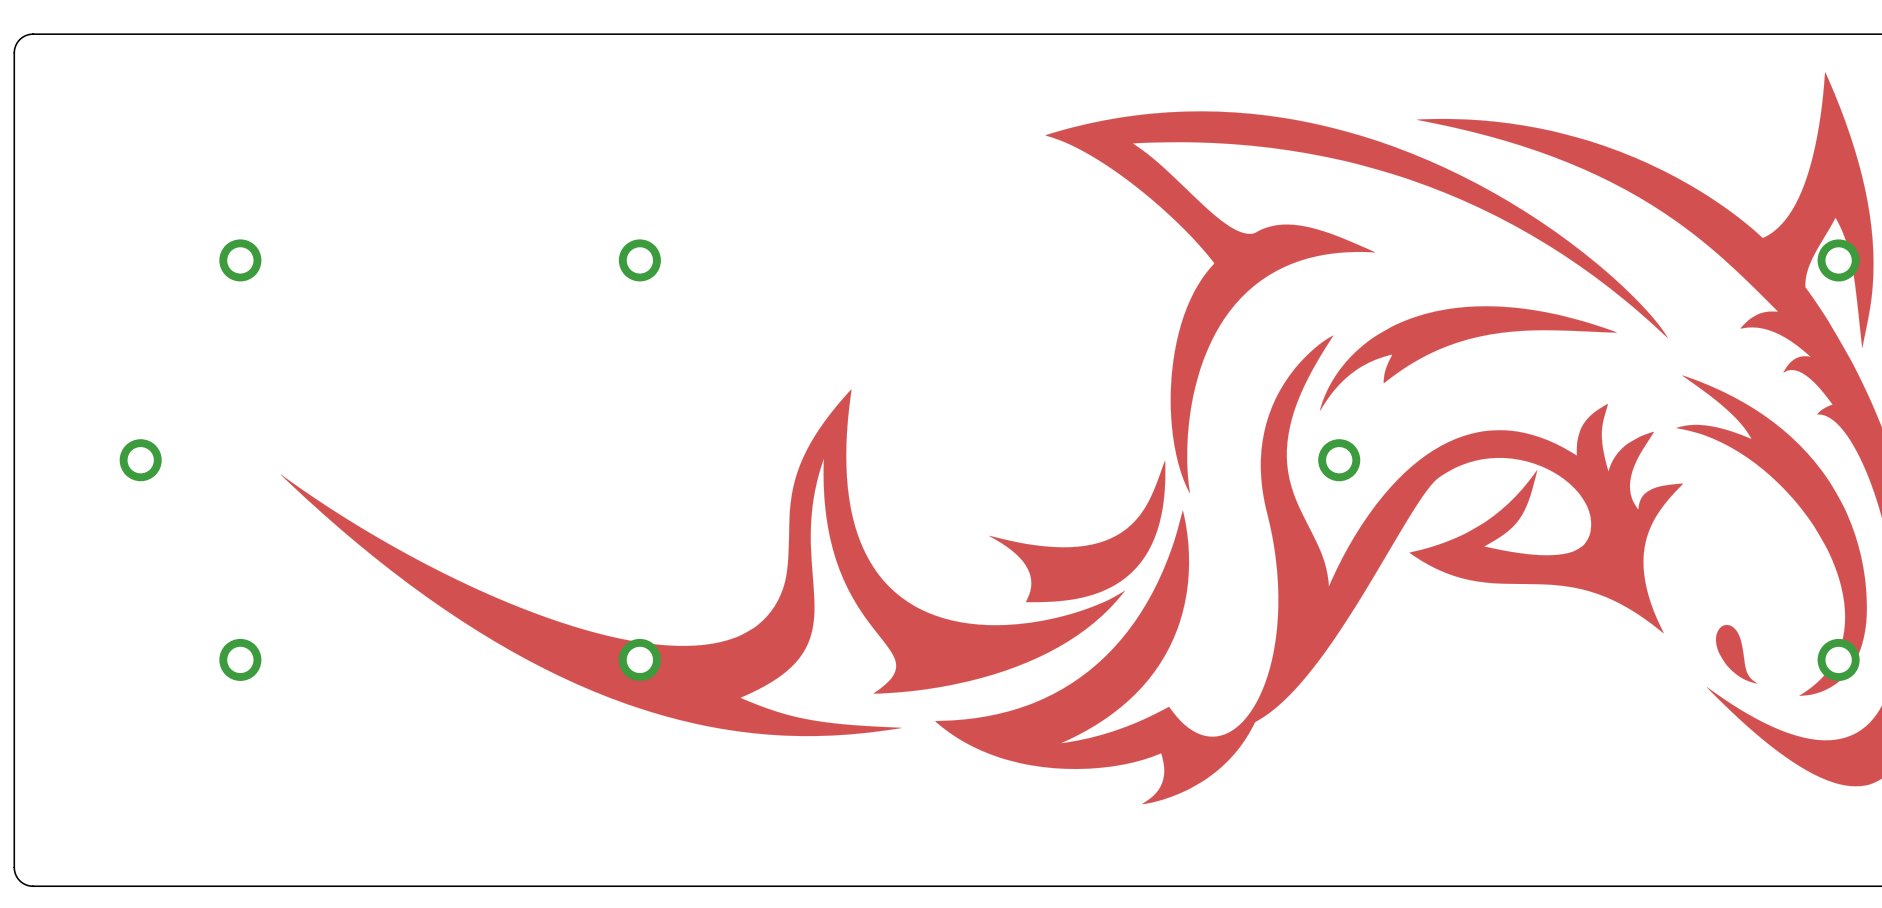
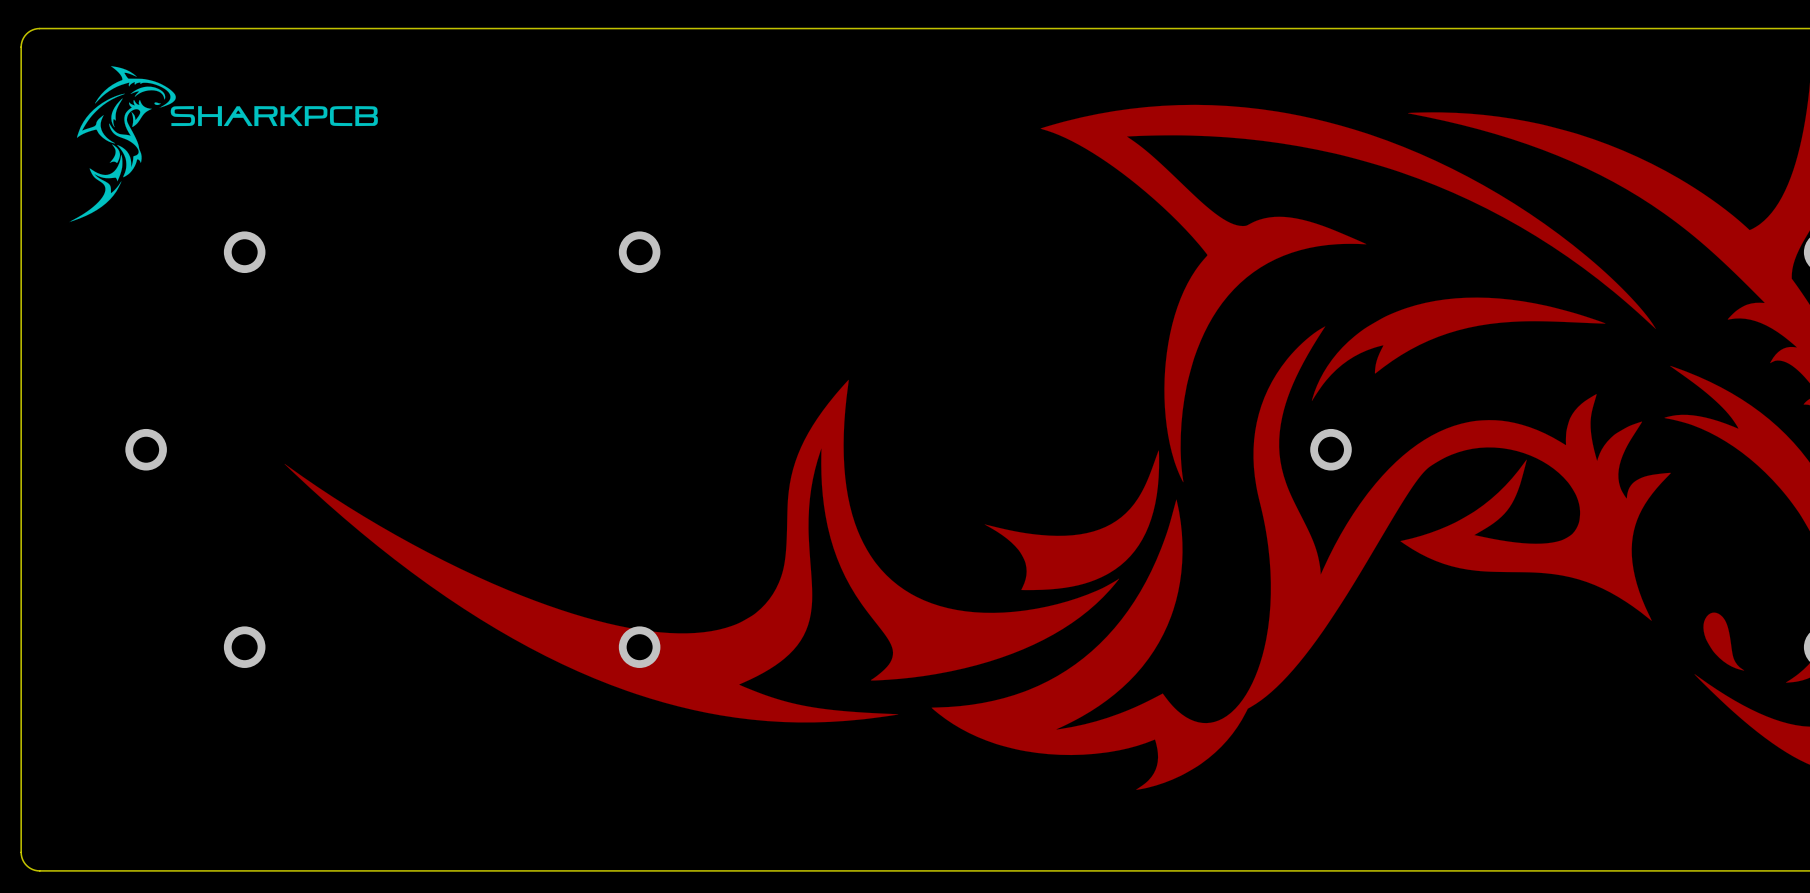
drawing: none -> [69, 66, 378, 223]

